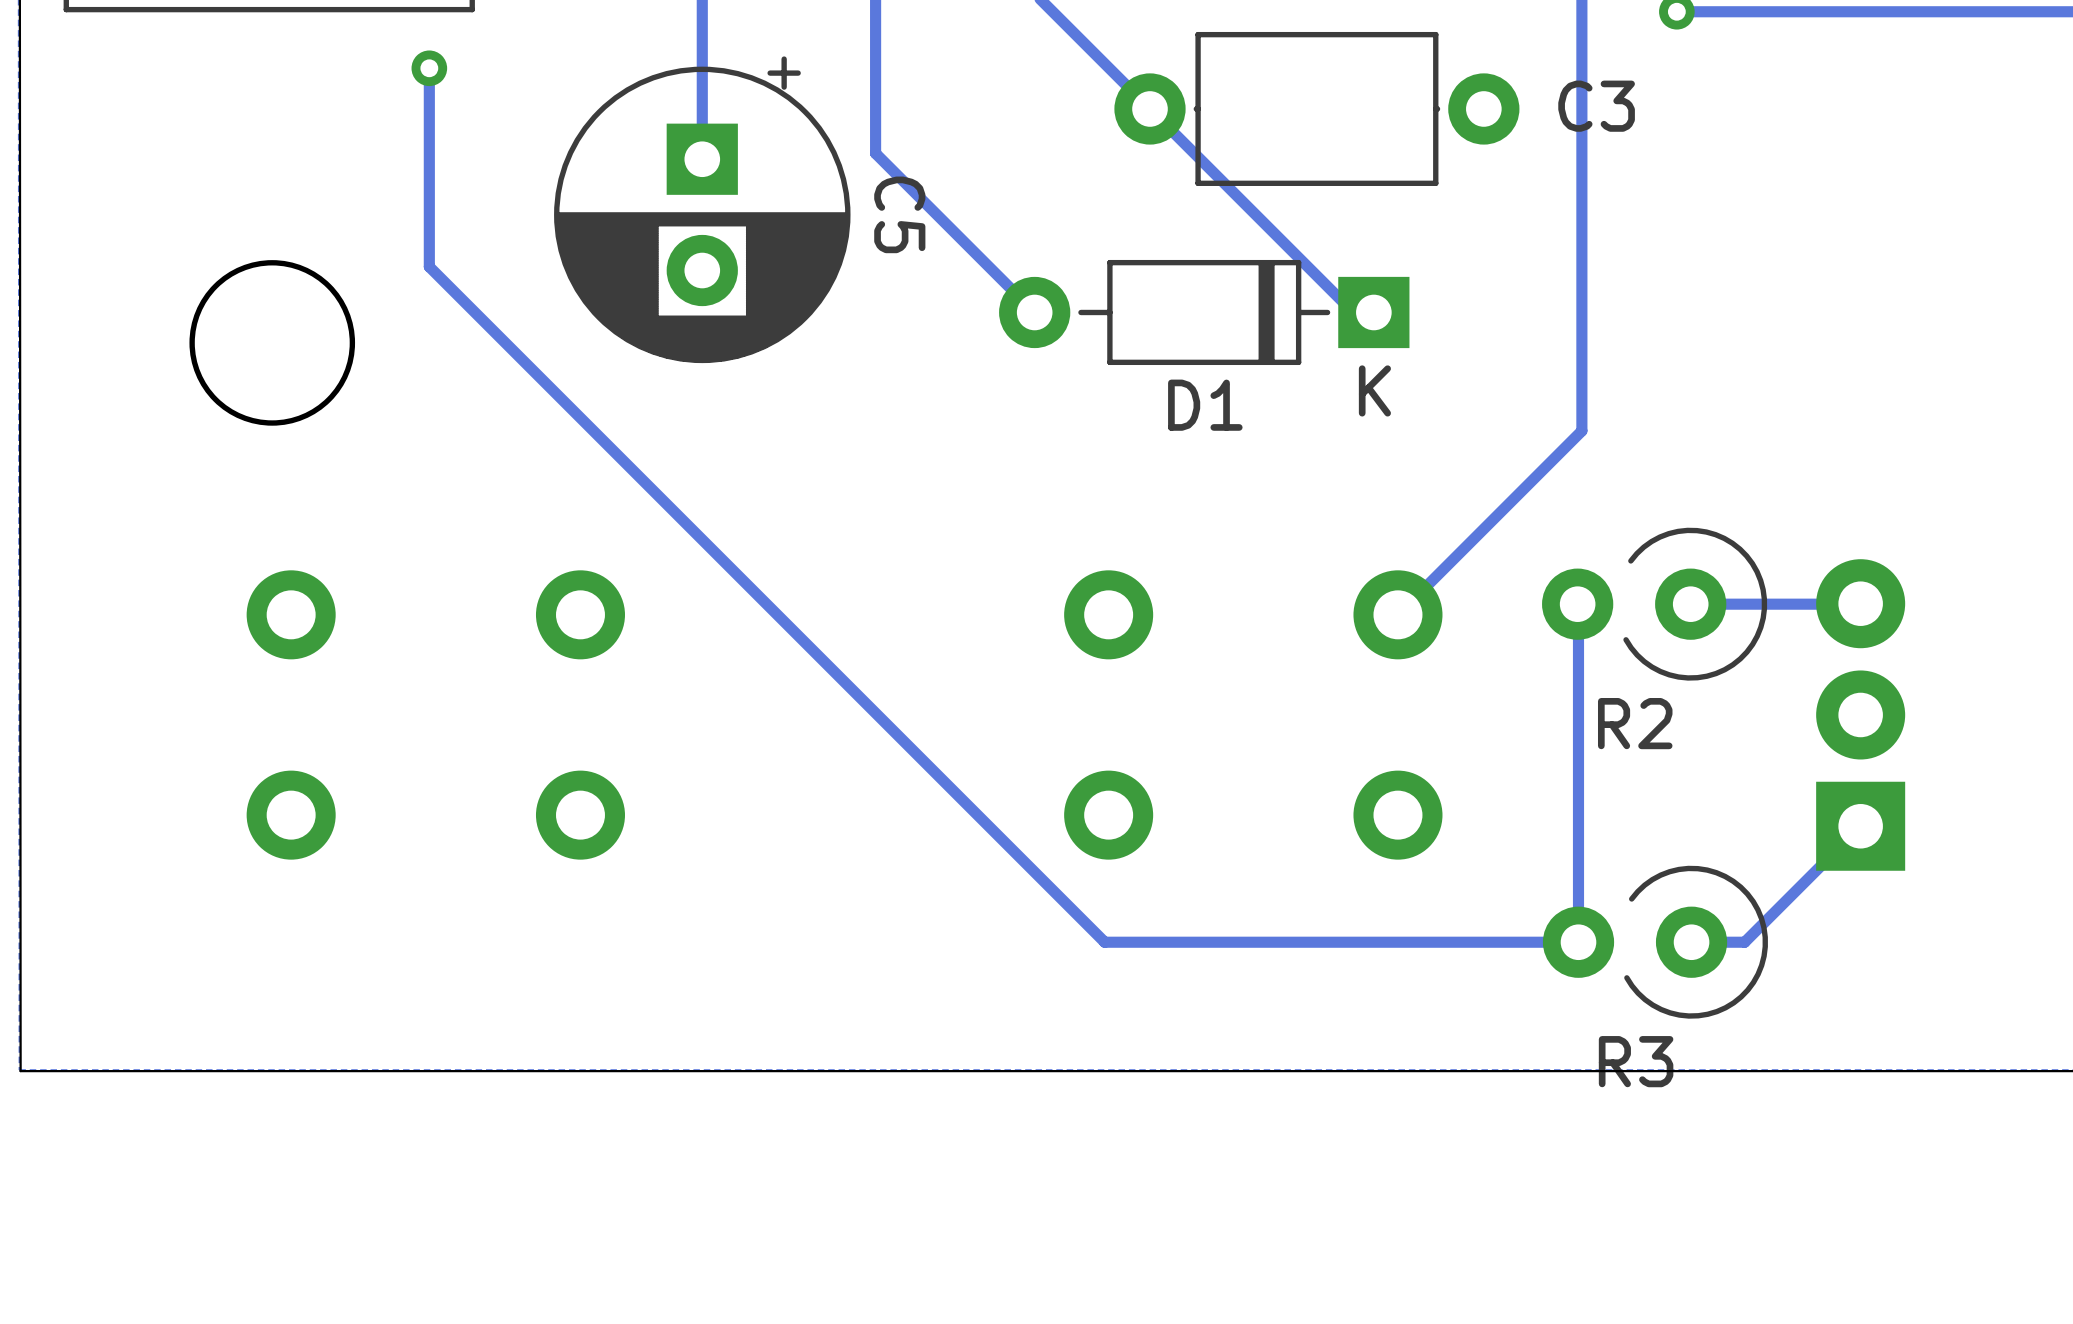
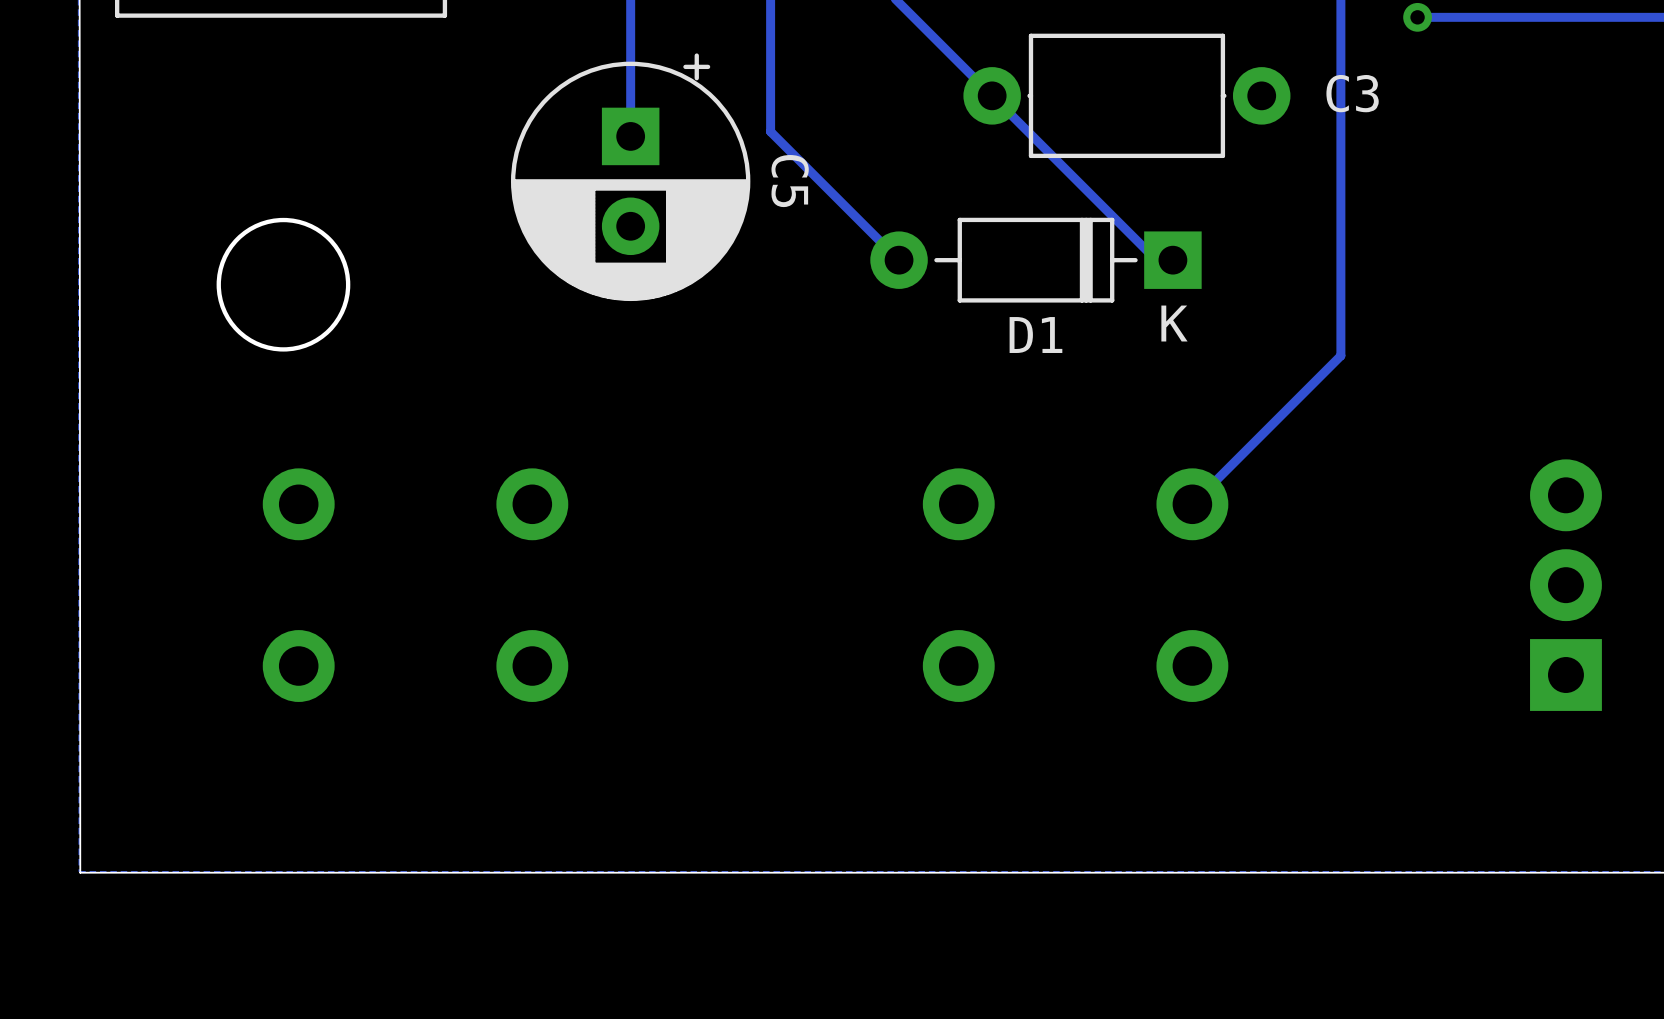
track: (429, 68) (429, 266) (1104, 942) (1578, 942) (1577, 604) -> none
via: (429, 68) -> none
R2: (1654, 604) -> none
track: (1860, 604) (1690, 604) -> none
track: (1860, 826) (1744, 942) (1691, 942) -> none
R3: (1655, 942) -> none

